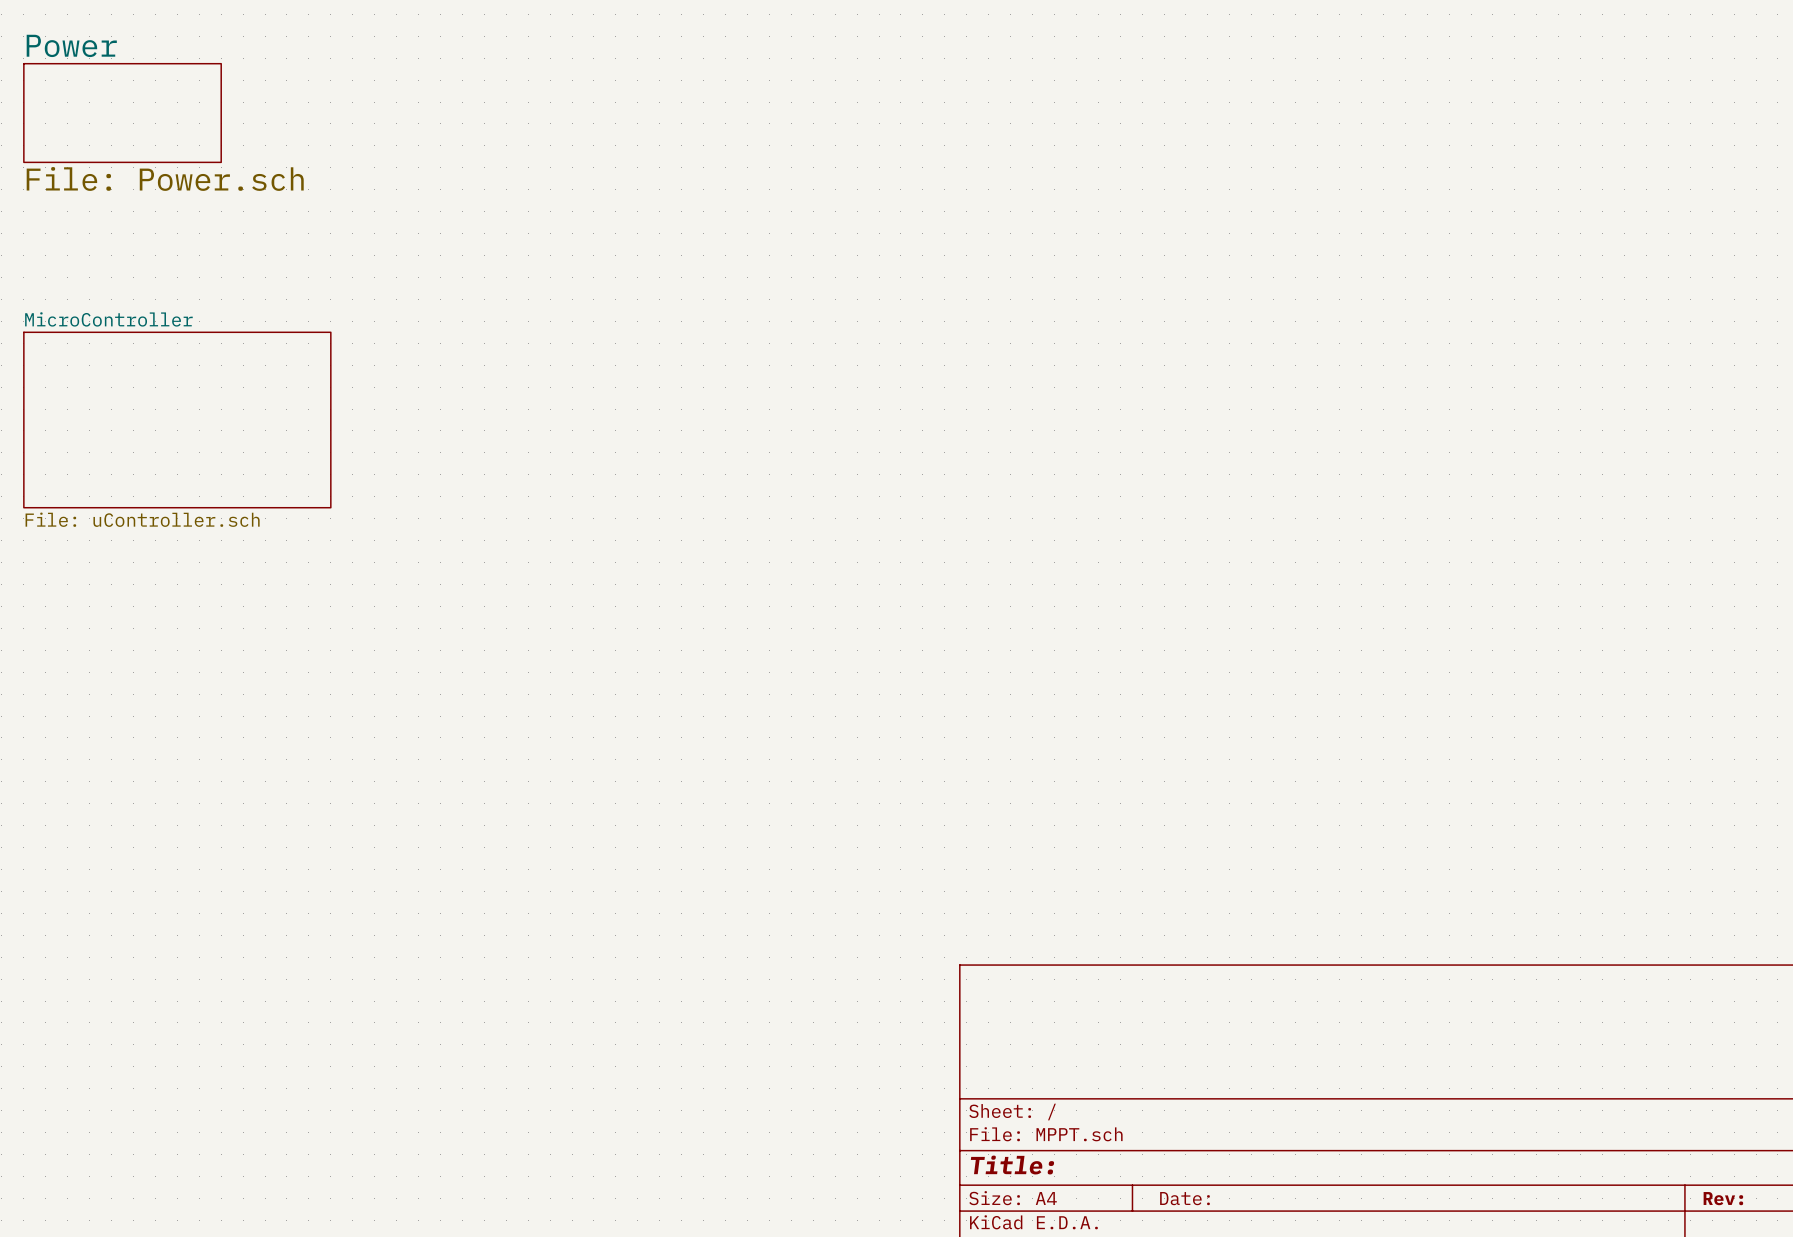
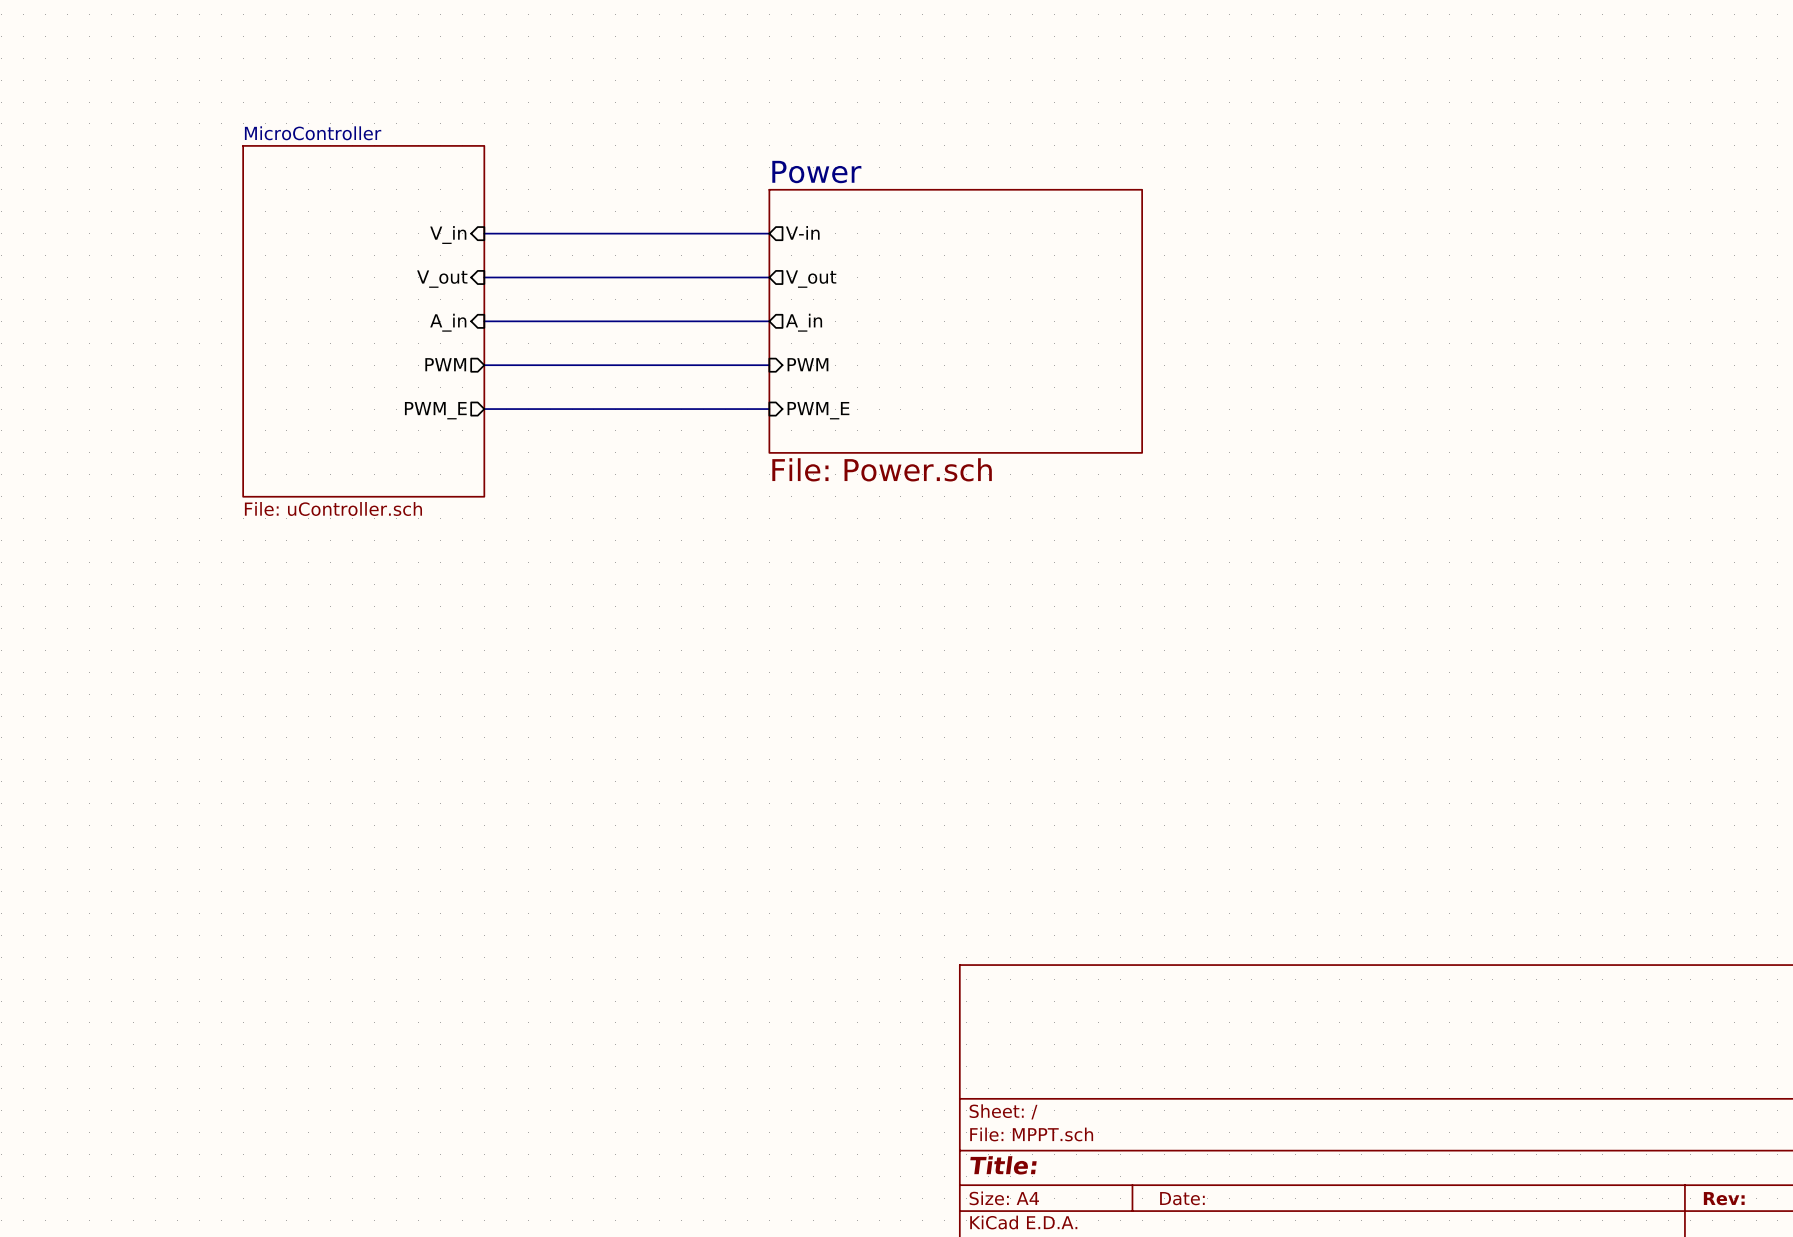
sheet Power: File: Power.sch (122, 113) -> none
sheet pin: none -> V-in (802, 232)
wire: none -> (484, 233) (769, 233)
sheet pin: none -> V_in (448, 234)
wire: none -> (484, 277) (769, 277)
sheet pin: none -> V_out (442, 279)
sheet pin: none -> V_out (811, 279)
sheet MicroController: none -> File: uController.sch (363, 321)
sheet pin: none -> A_in (448, 322)
wire: none -> (484, 321) (769, 321)
sheet pin: none -> A_in (804, 322)
sheet Power: none -> File: Power.sch (955, 321)
sheet pin: none -> PWM (445, 364)
sheet pin: none -> PWM (807, 364)
wire: none -> (484, 365) (769, 365)
wire: none -> (484, 409) (769, 409)
sheet pin: none -> PWM_E (435, 410)
sheet pin: none -> PWM_E (818, 410)
sheet MicroController: File: uController.sch (177, 420) -> none

